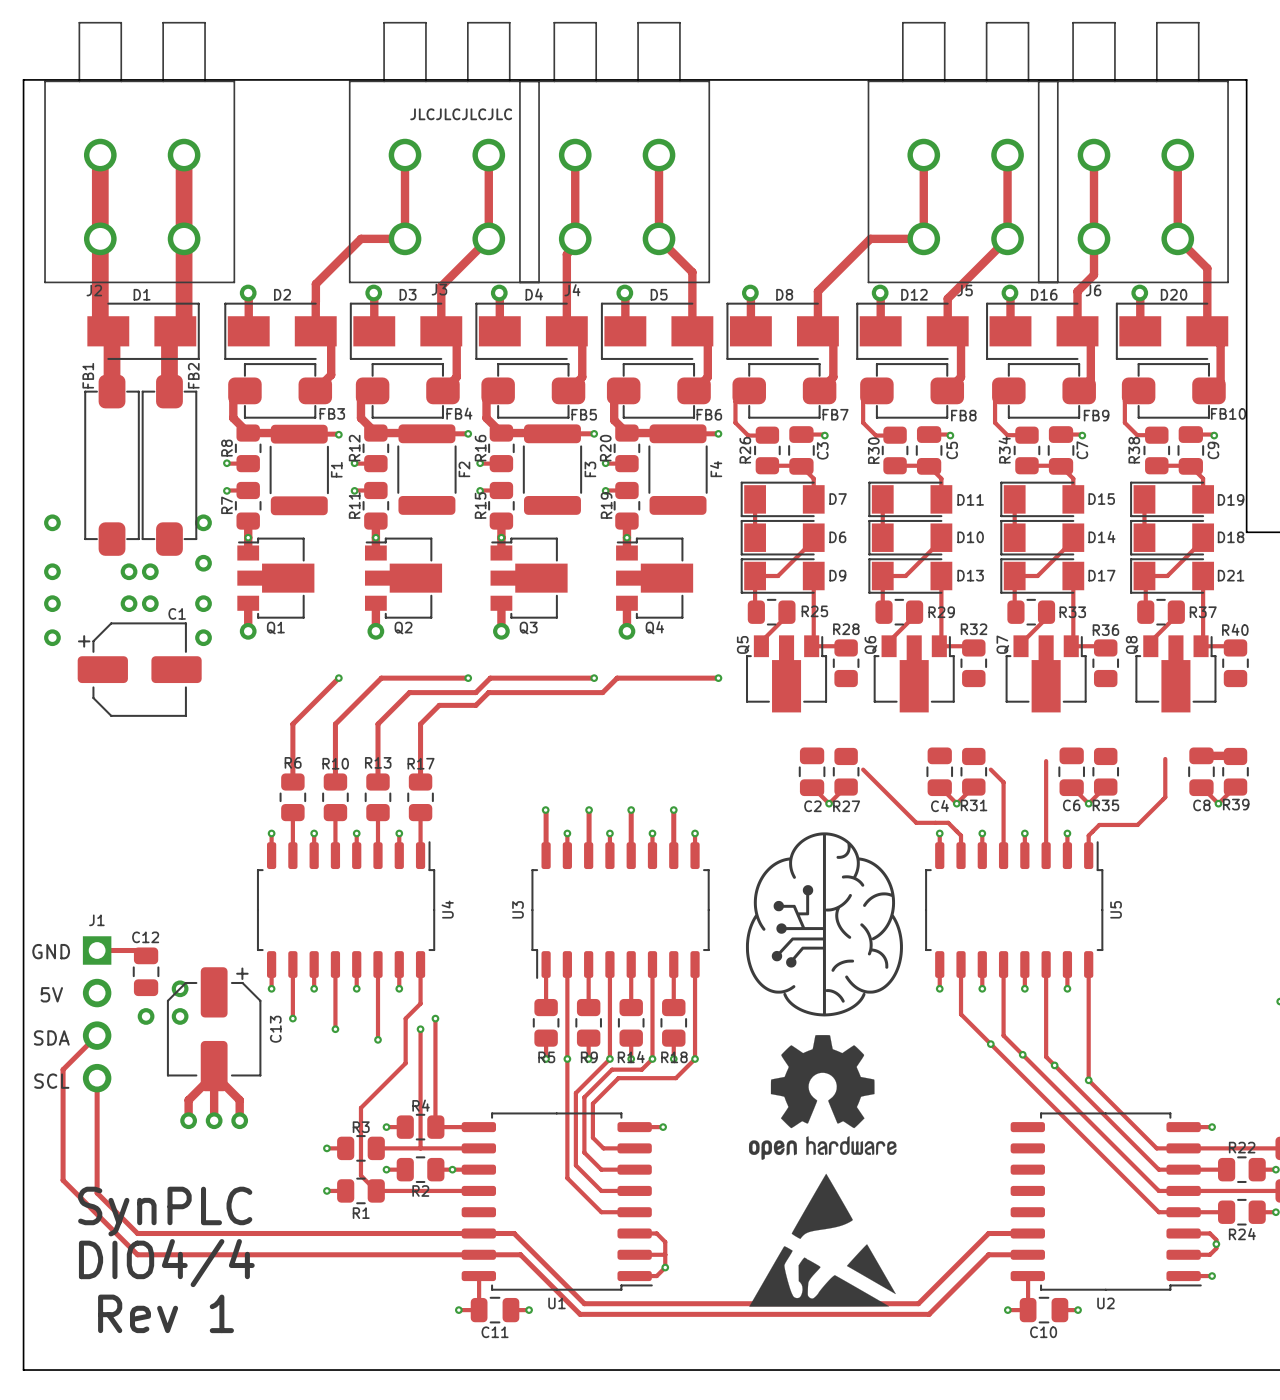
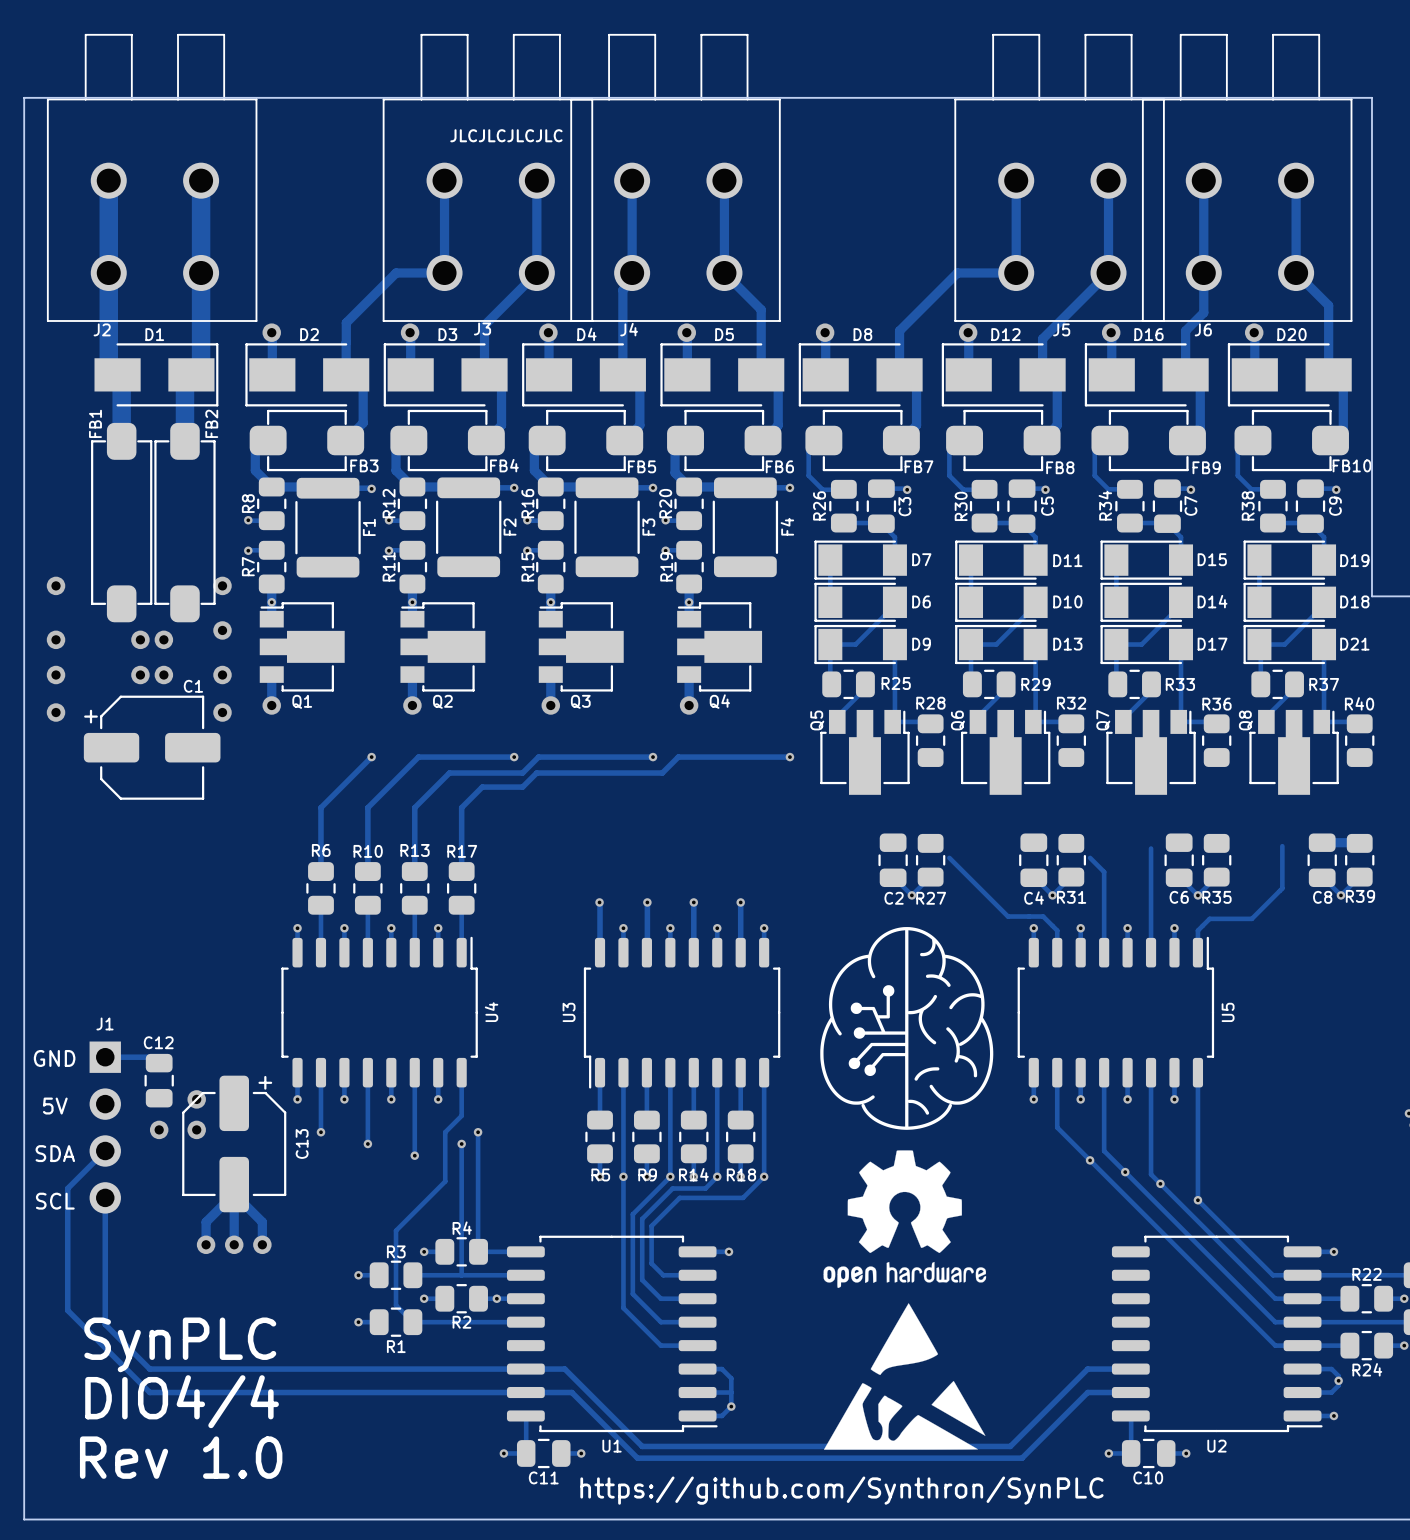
text: Rev 1 (166, 1313) -> Rev 1.0 (181, 1457)
text: none -> https://github.com/Synthron/SynPLC (841, 1490)

